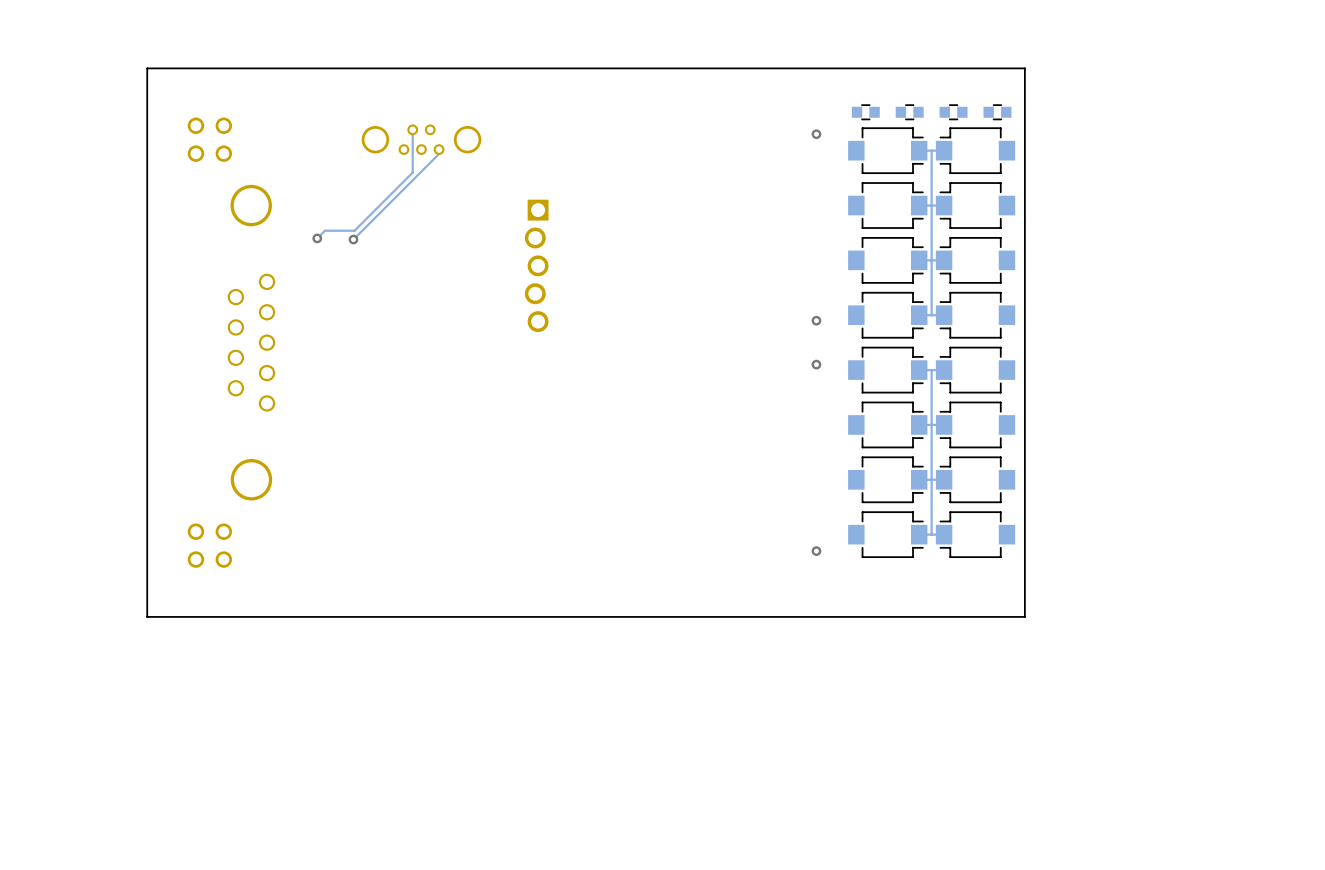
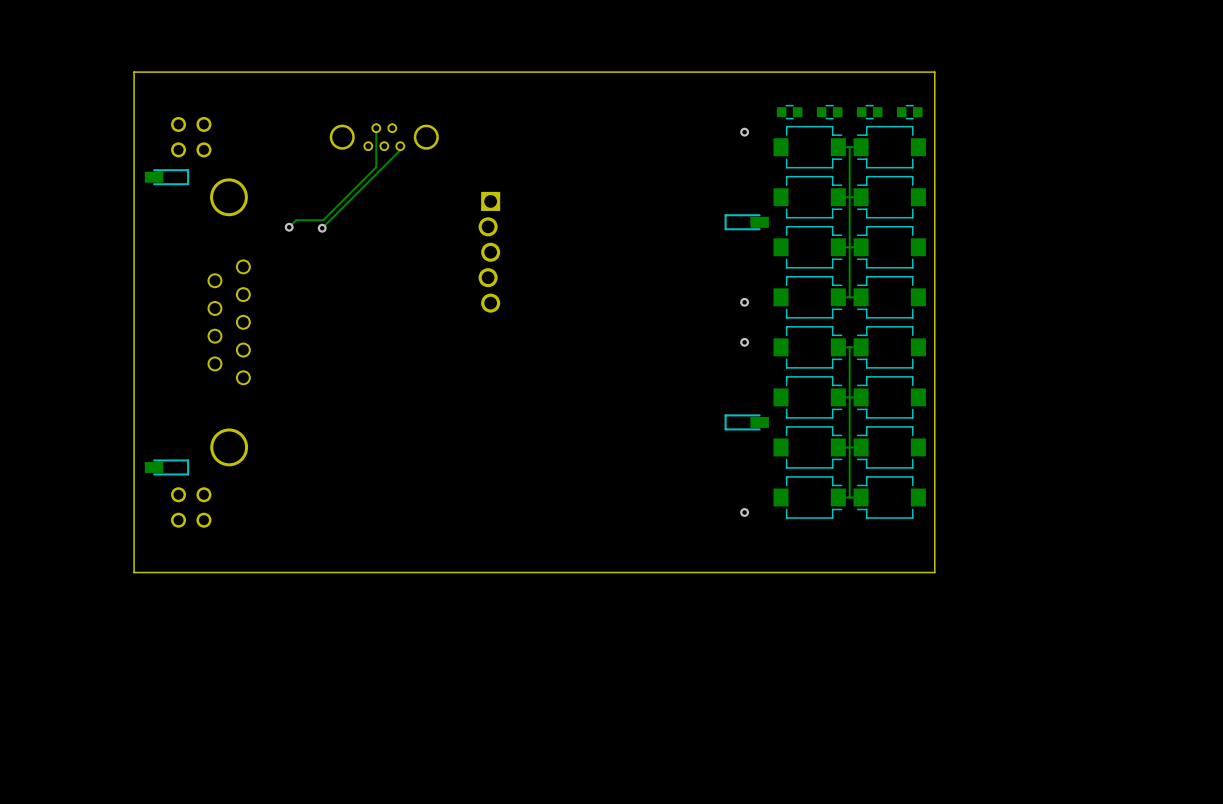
part: none -> (166, 177)
part: none -> (746, 222)
part: none -> (746, 422)
part: none -> (166, 467)

